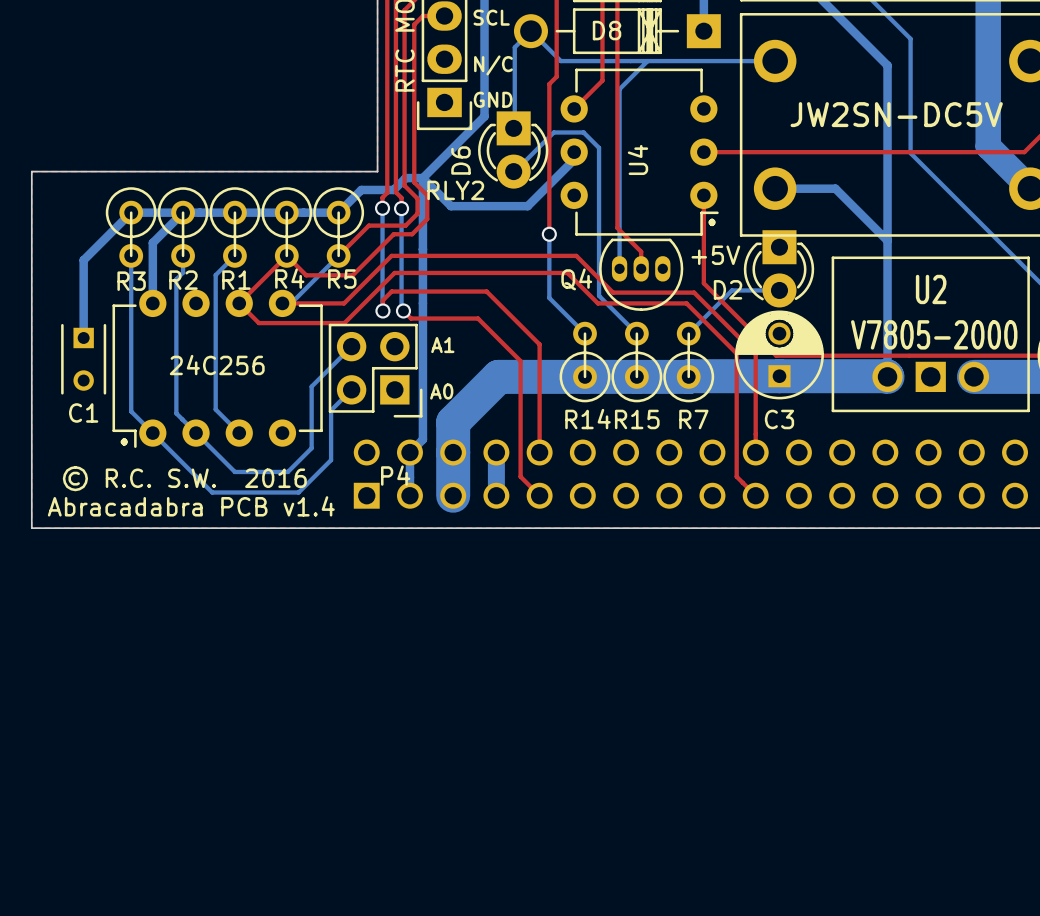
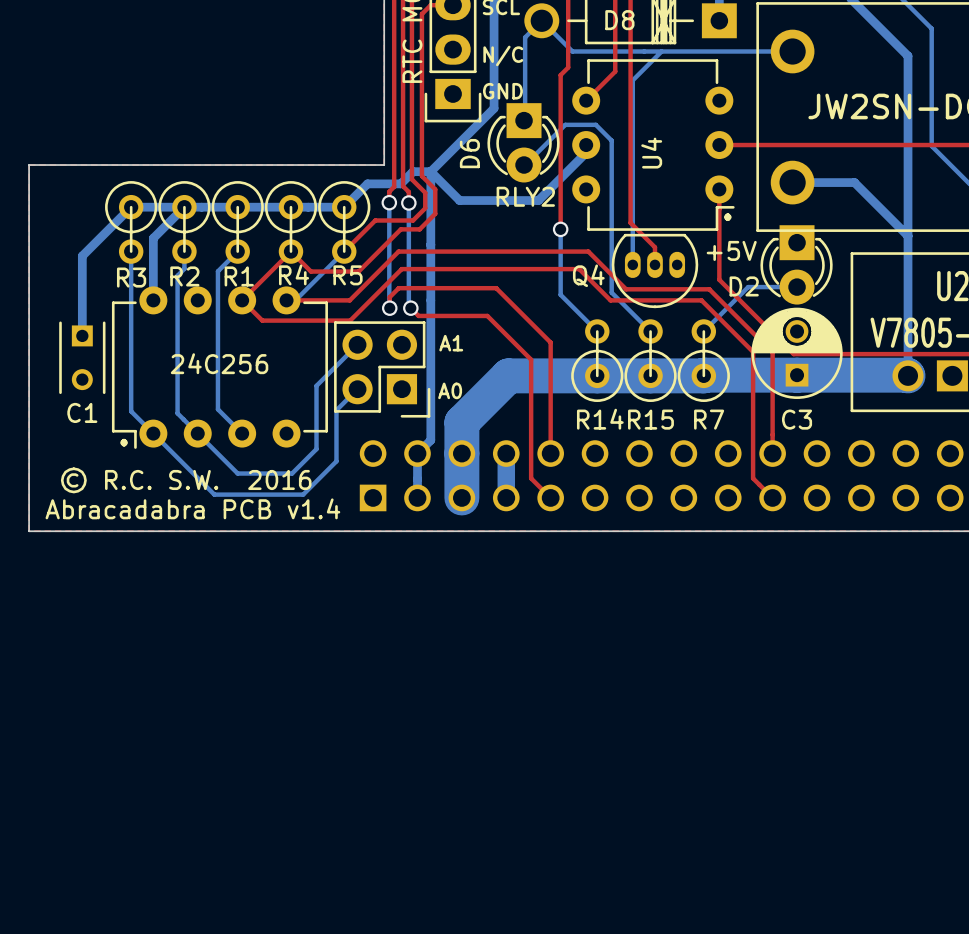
text position: RLY2 (455, 190) -> RLY2 (525, 196)
P4 name: P4 (395, 475) -> none

